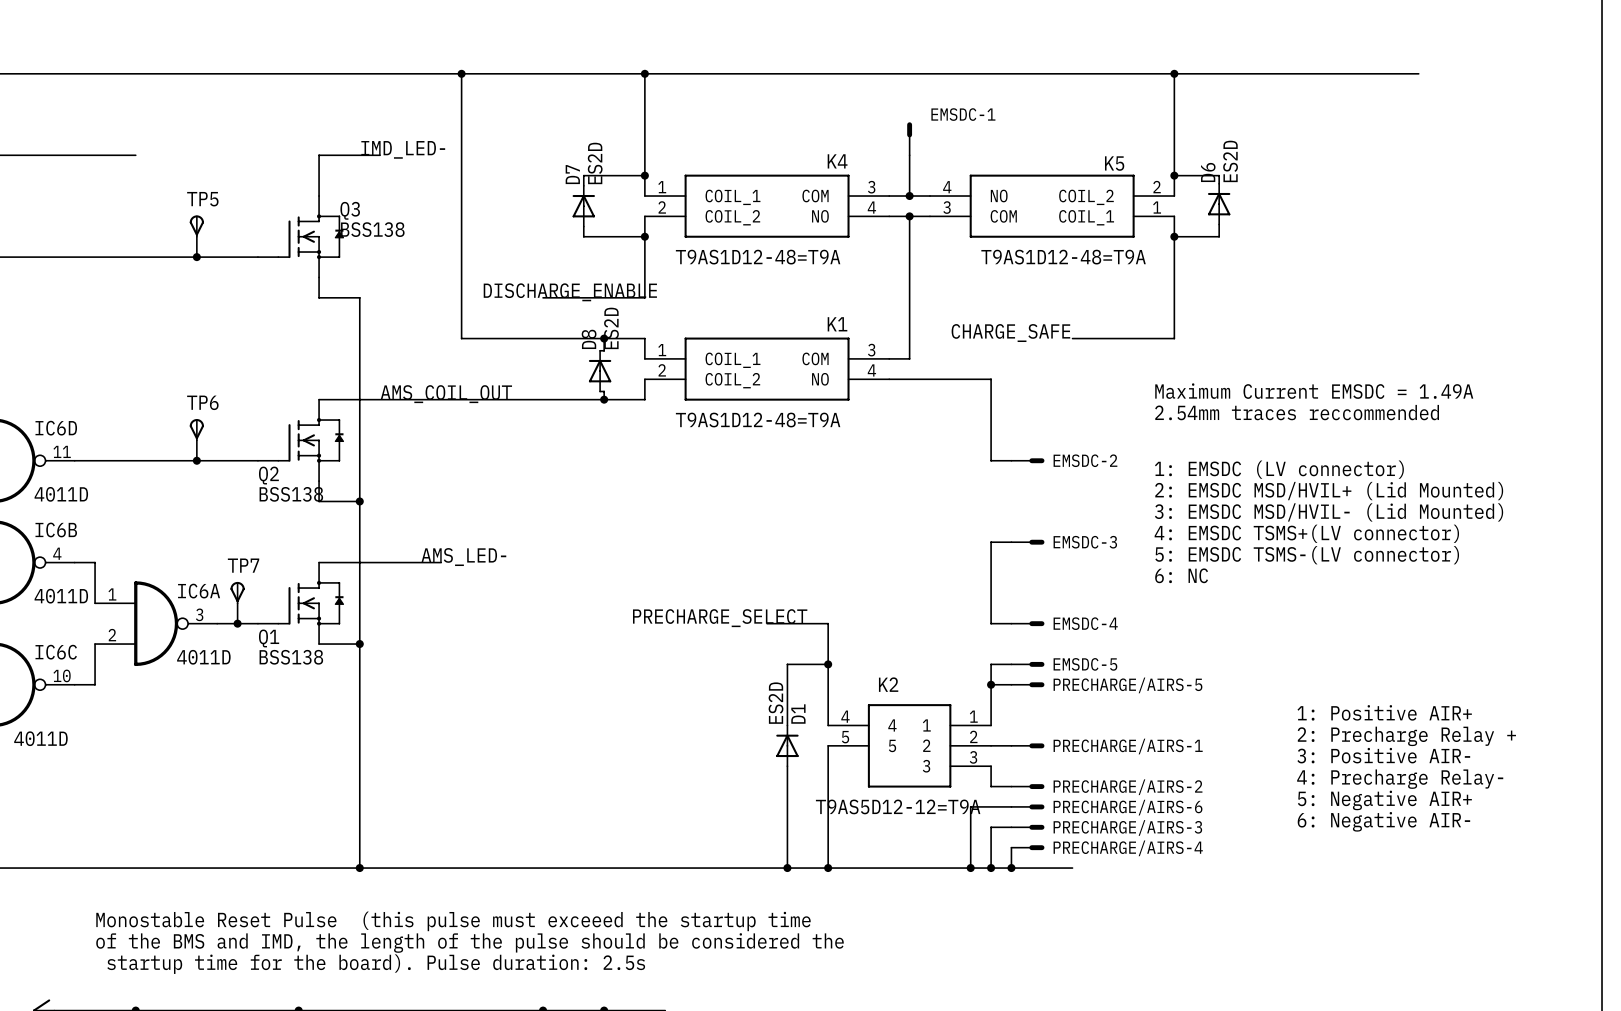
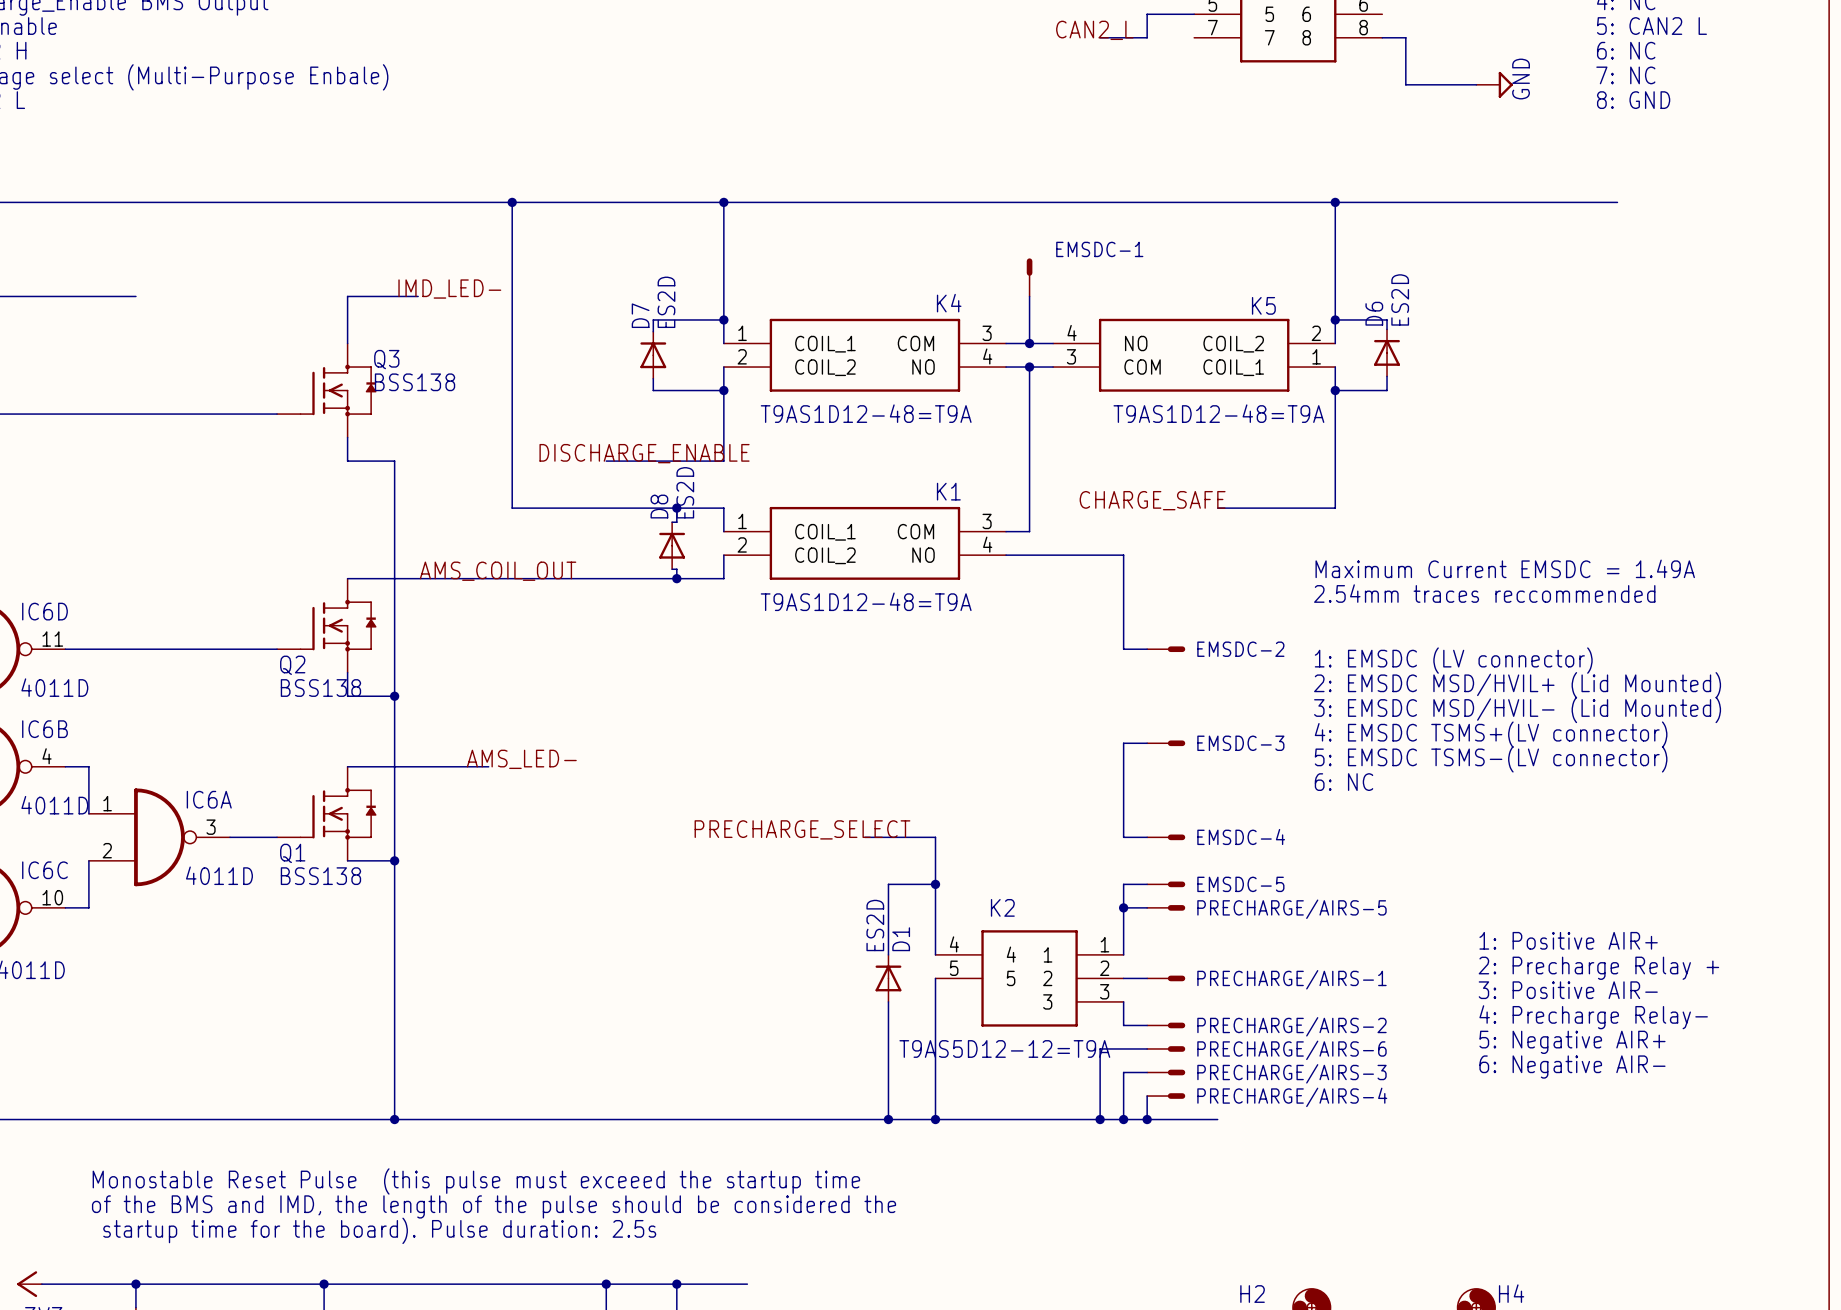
TP5: (196, 226) -> none
wire: (196, 236) (196, 257) -> none
junction: (196, 257) -> none
TP6: (196, 429) -> none
wire: (196, 440) (196, 460) -> none
junction: (196, 460) -> none
TP7: (237, 592) -> none
wire: (237, 603) (237, 623) -> none
junction: (237, 623) -> none

